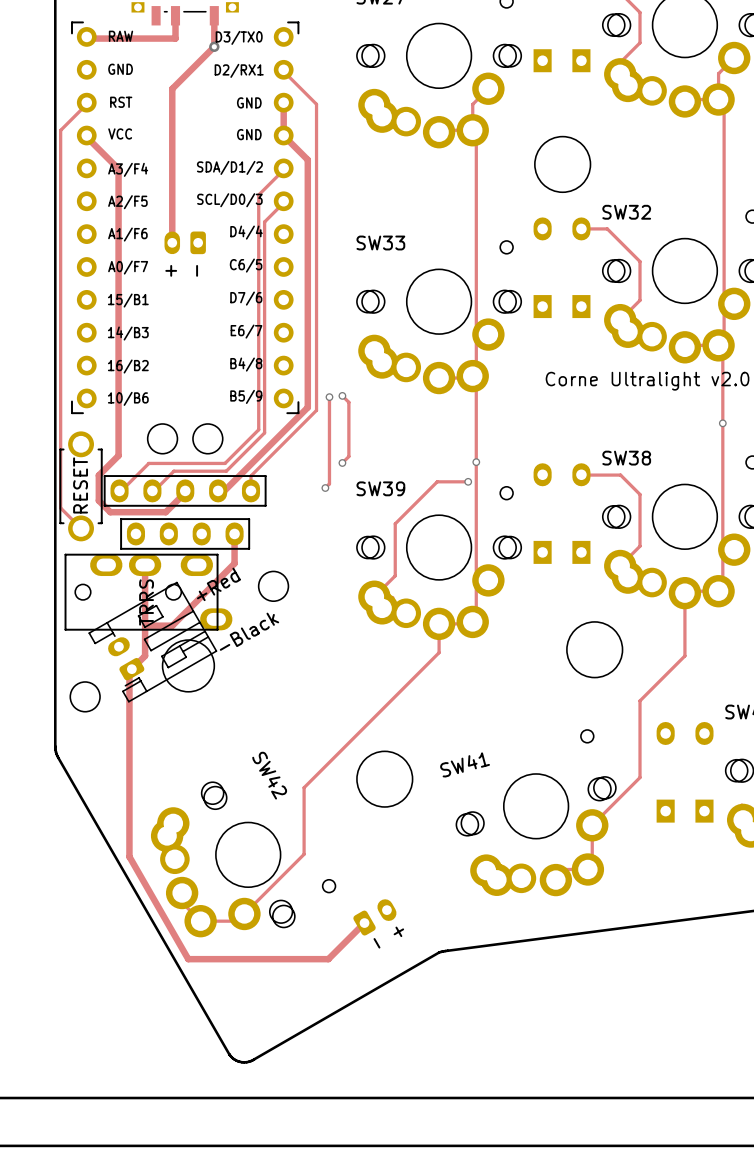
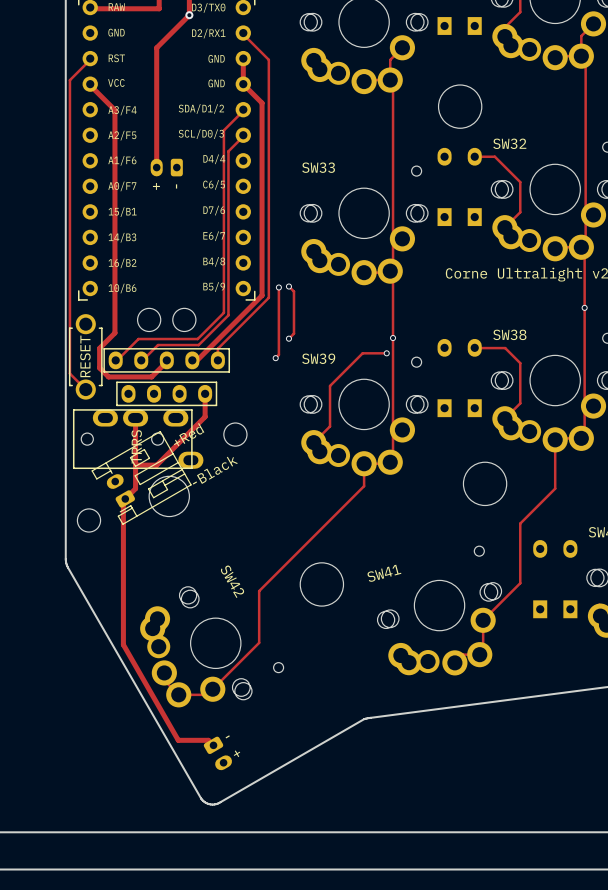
part rotation: 0° (374, 917) -> 90° clockwise (217, 753)
part position: (374, 917) -> (217, 753)
track: (364, 923) (328, 959) (188, 959) -> (213, 745) (208, 740) (178, 740) (169, 724)
text rotation: 0° (398, 931) -> 90° clockwise (237, 753)
text position: + (398, 931) -> + (237, 753)
text rotation: 0° (376, 943) -> 90° clockwise (227, 736)
text position: - (376, 943) -> - (227, 736)

